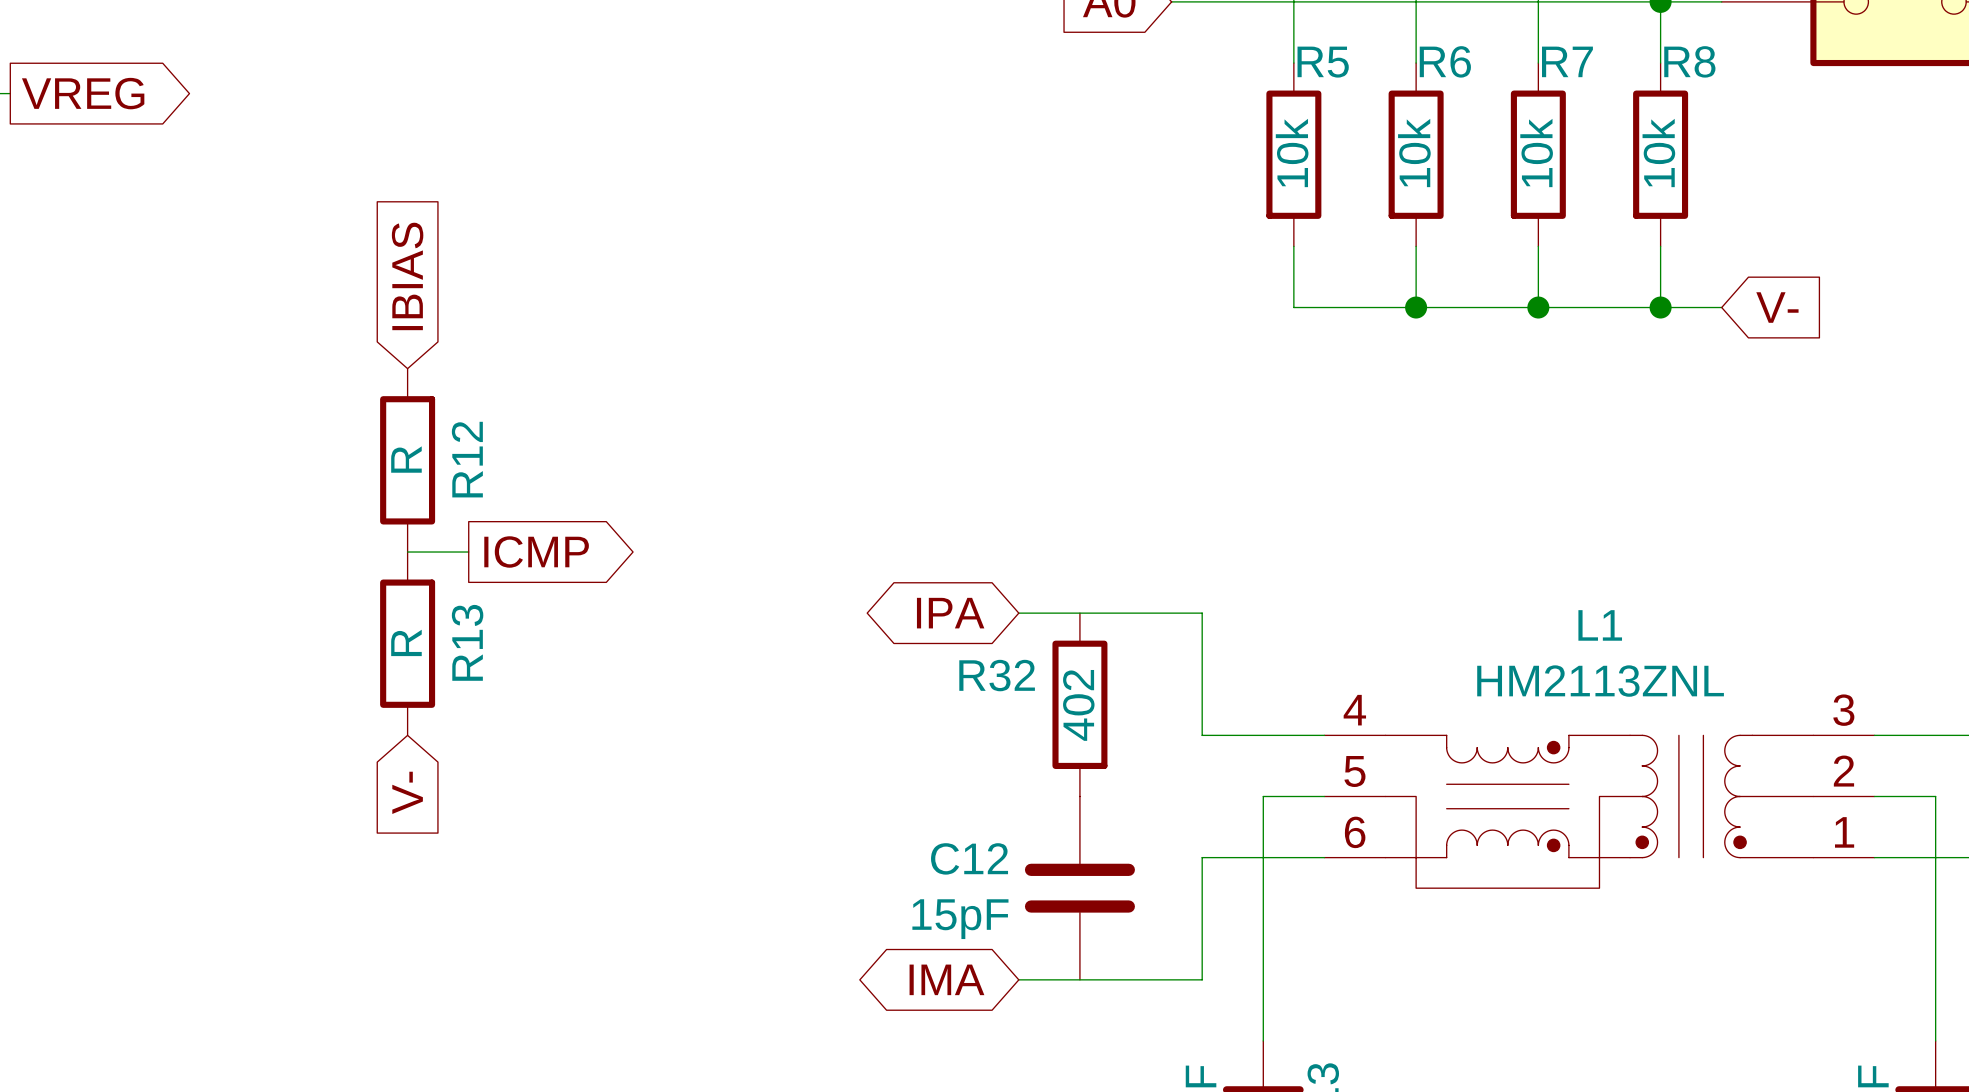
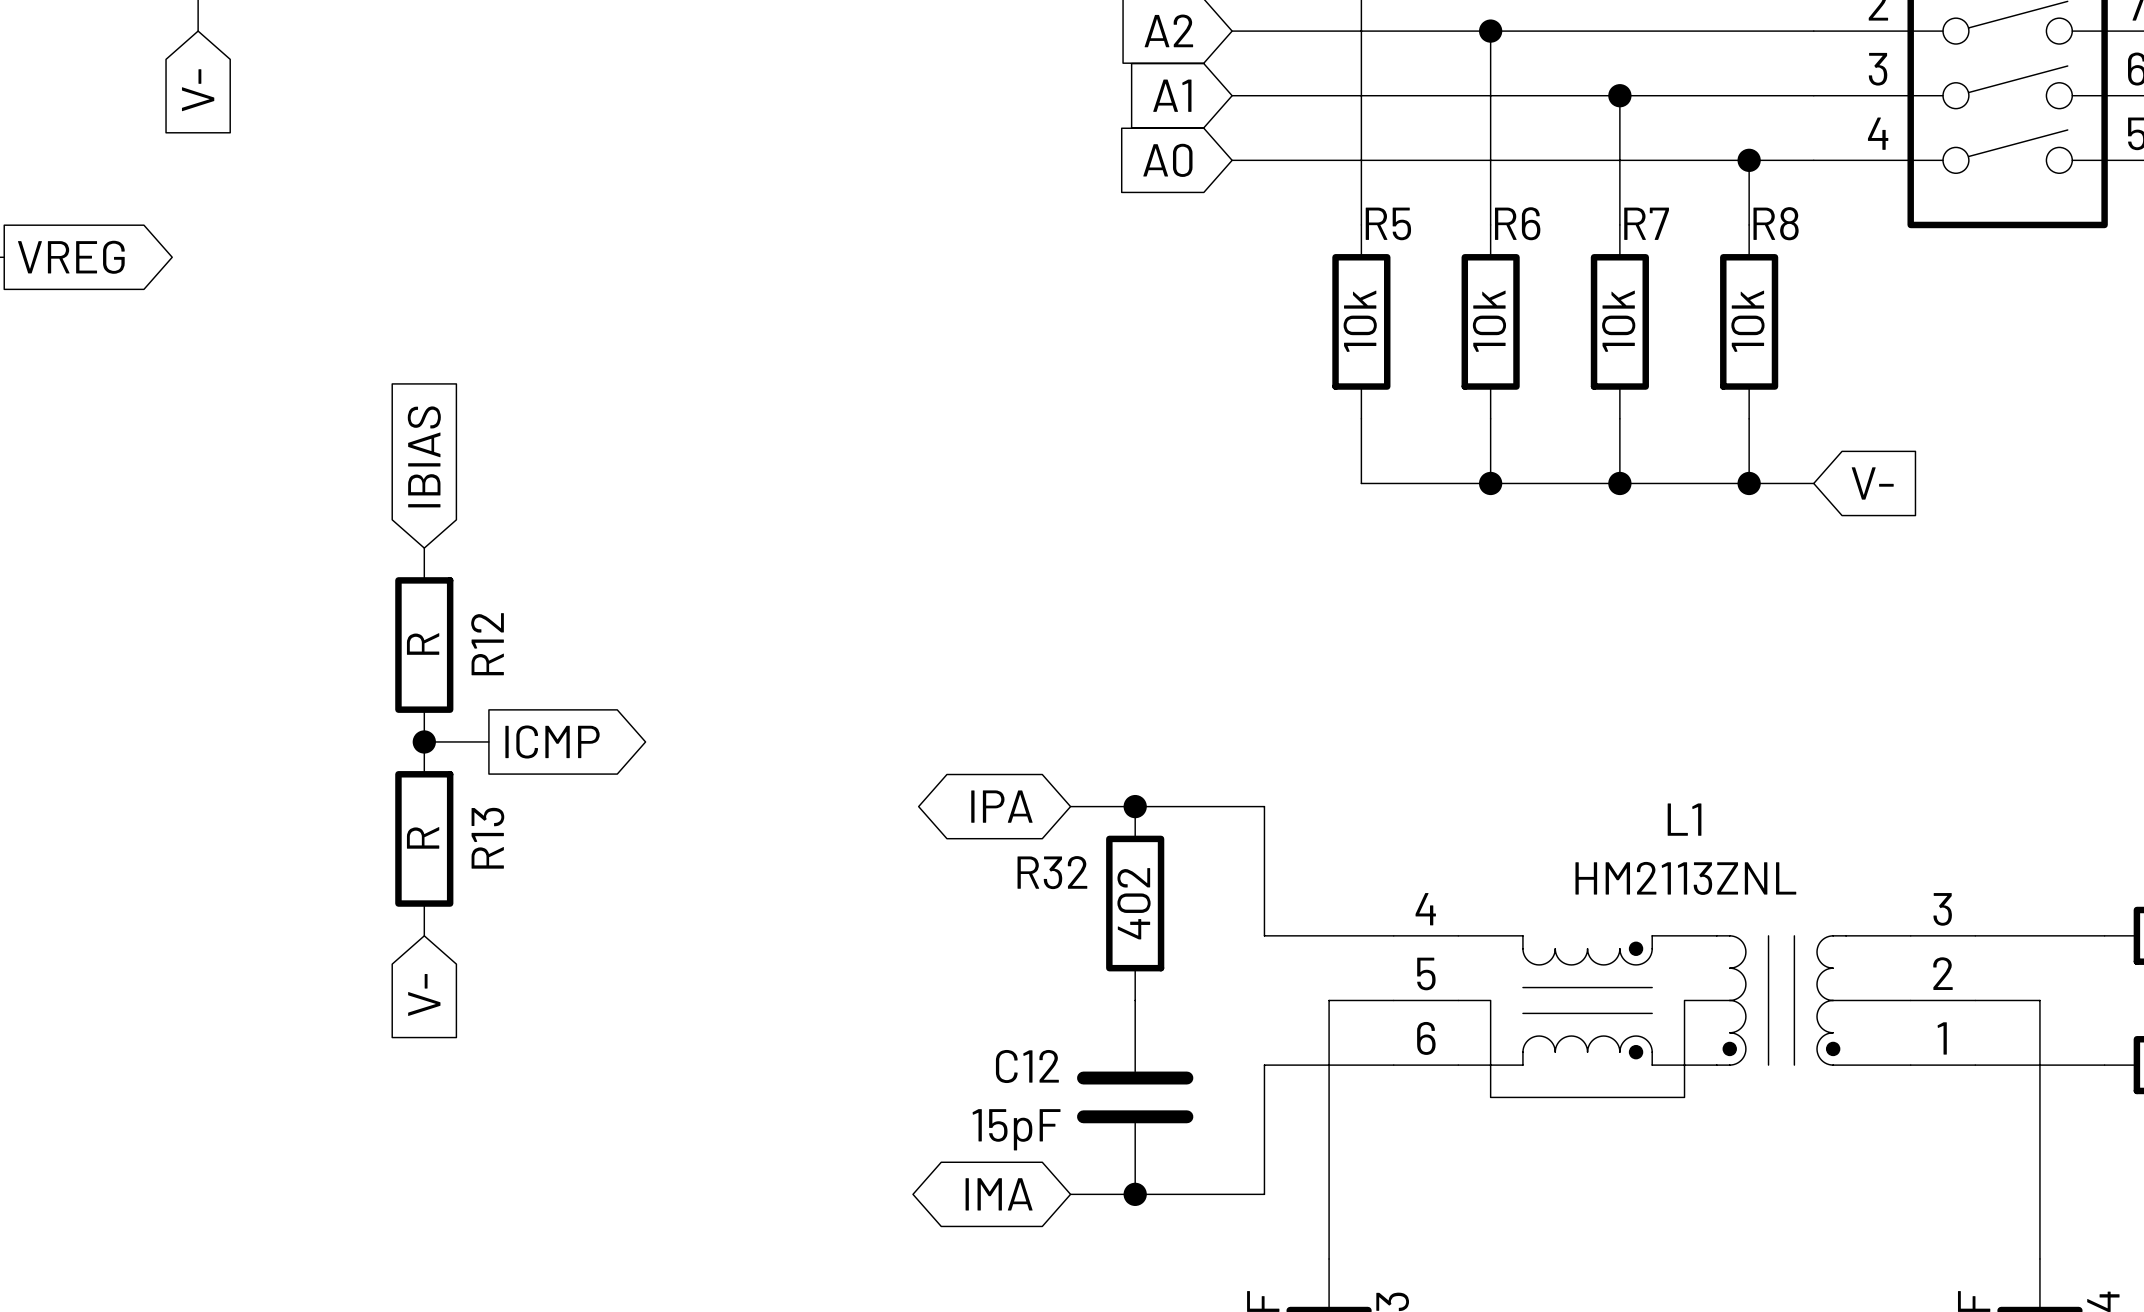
junction: none -> (424, 741)
junction: none -> (1135, 806)
junction: none -> (1135, 1194)

